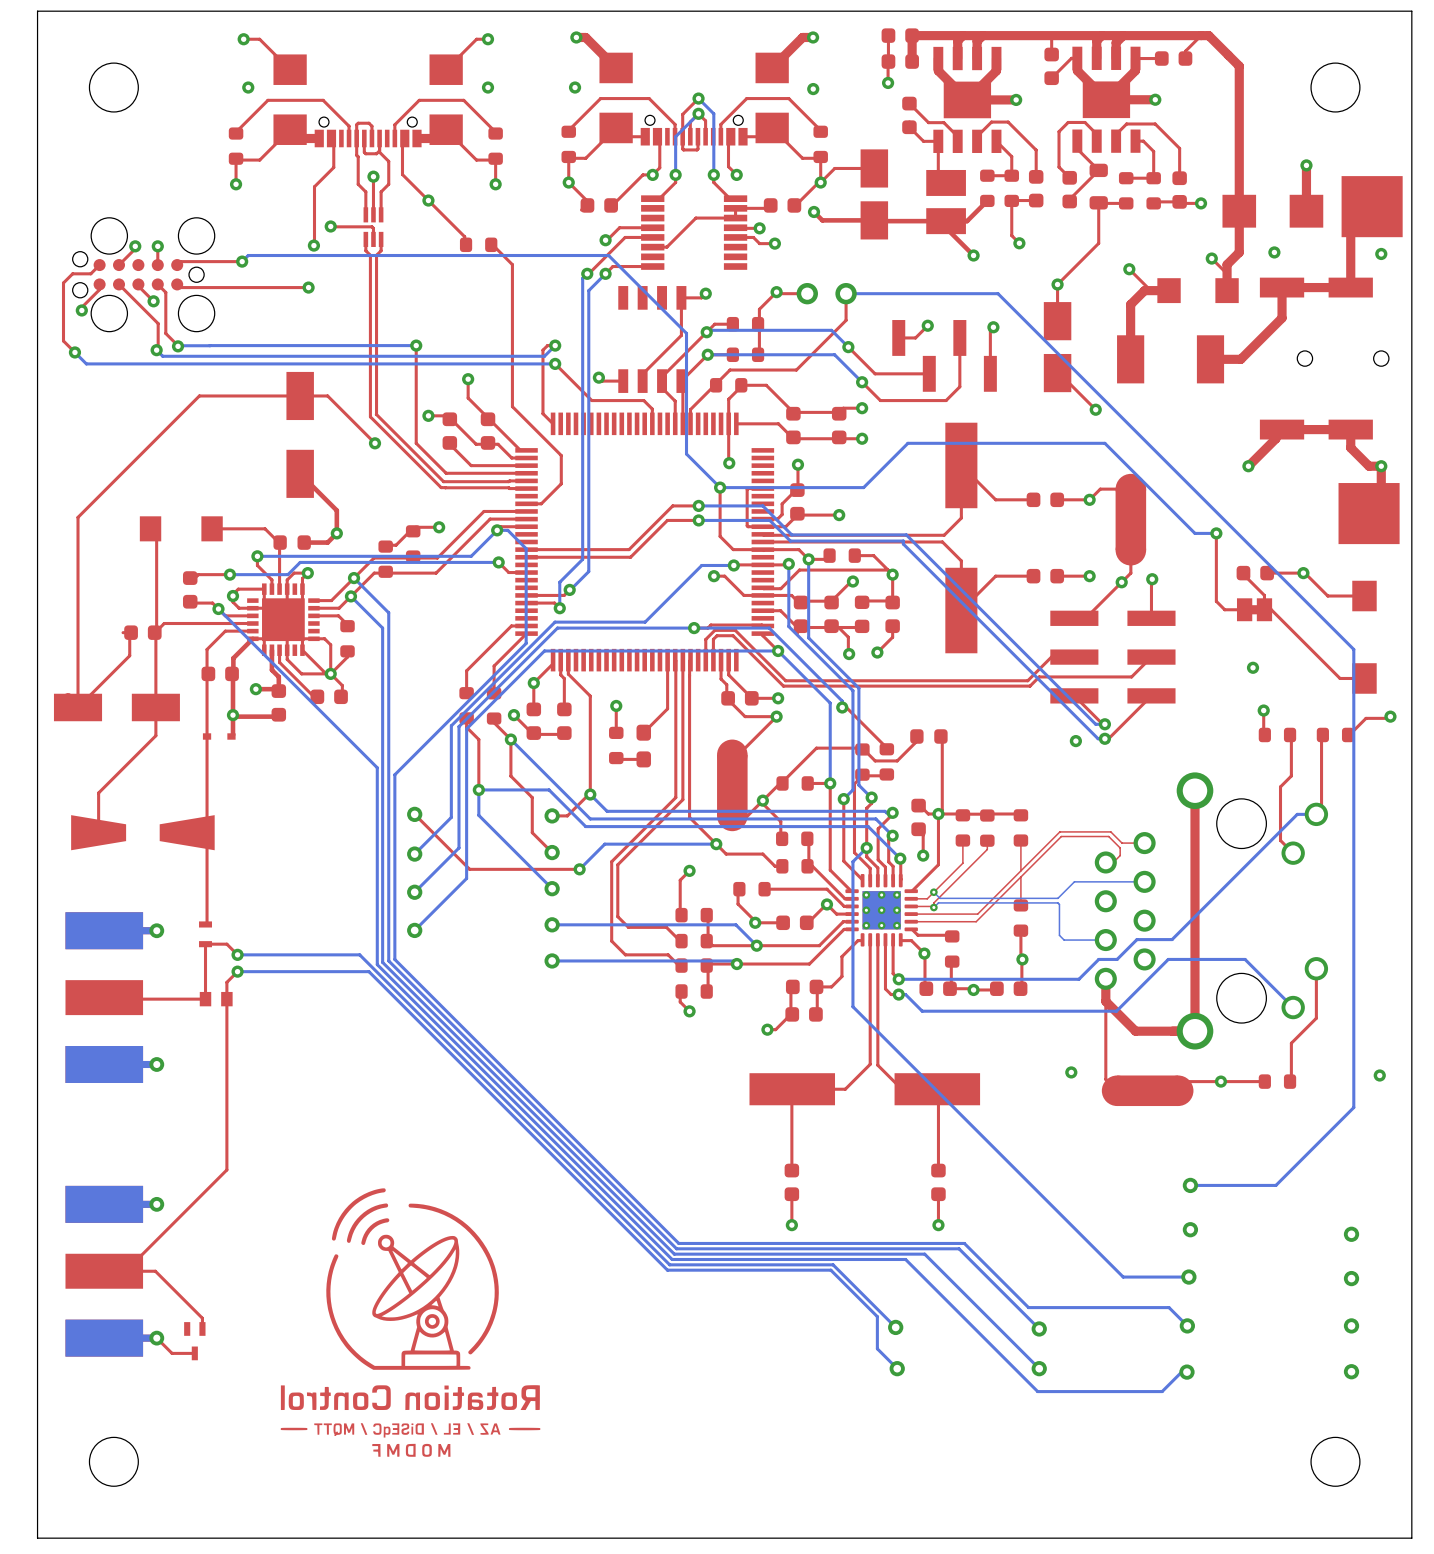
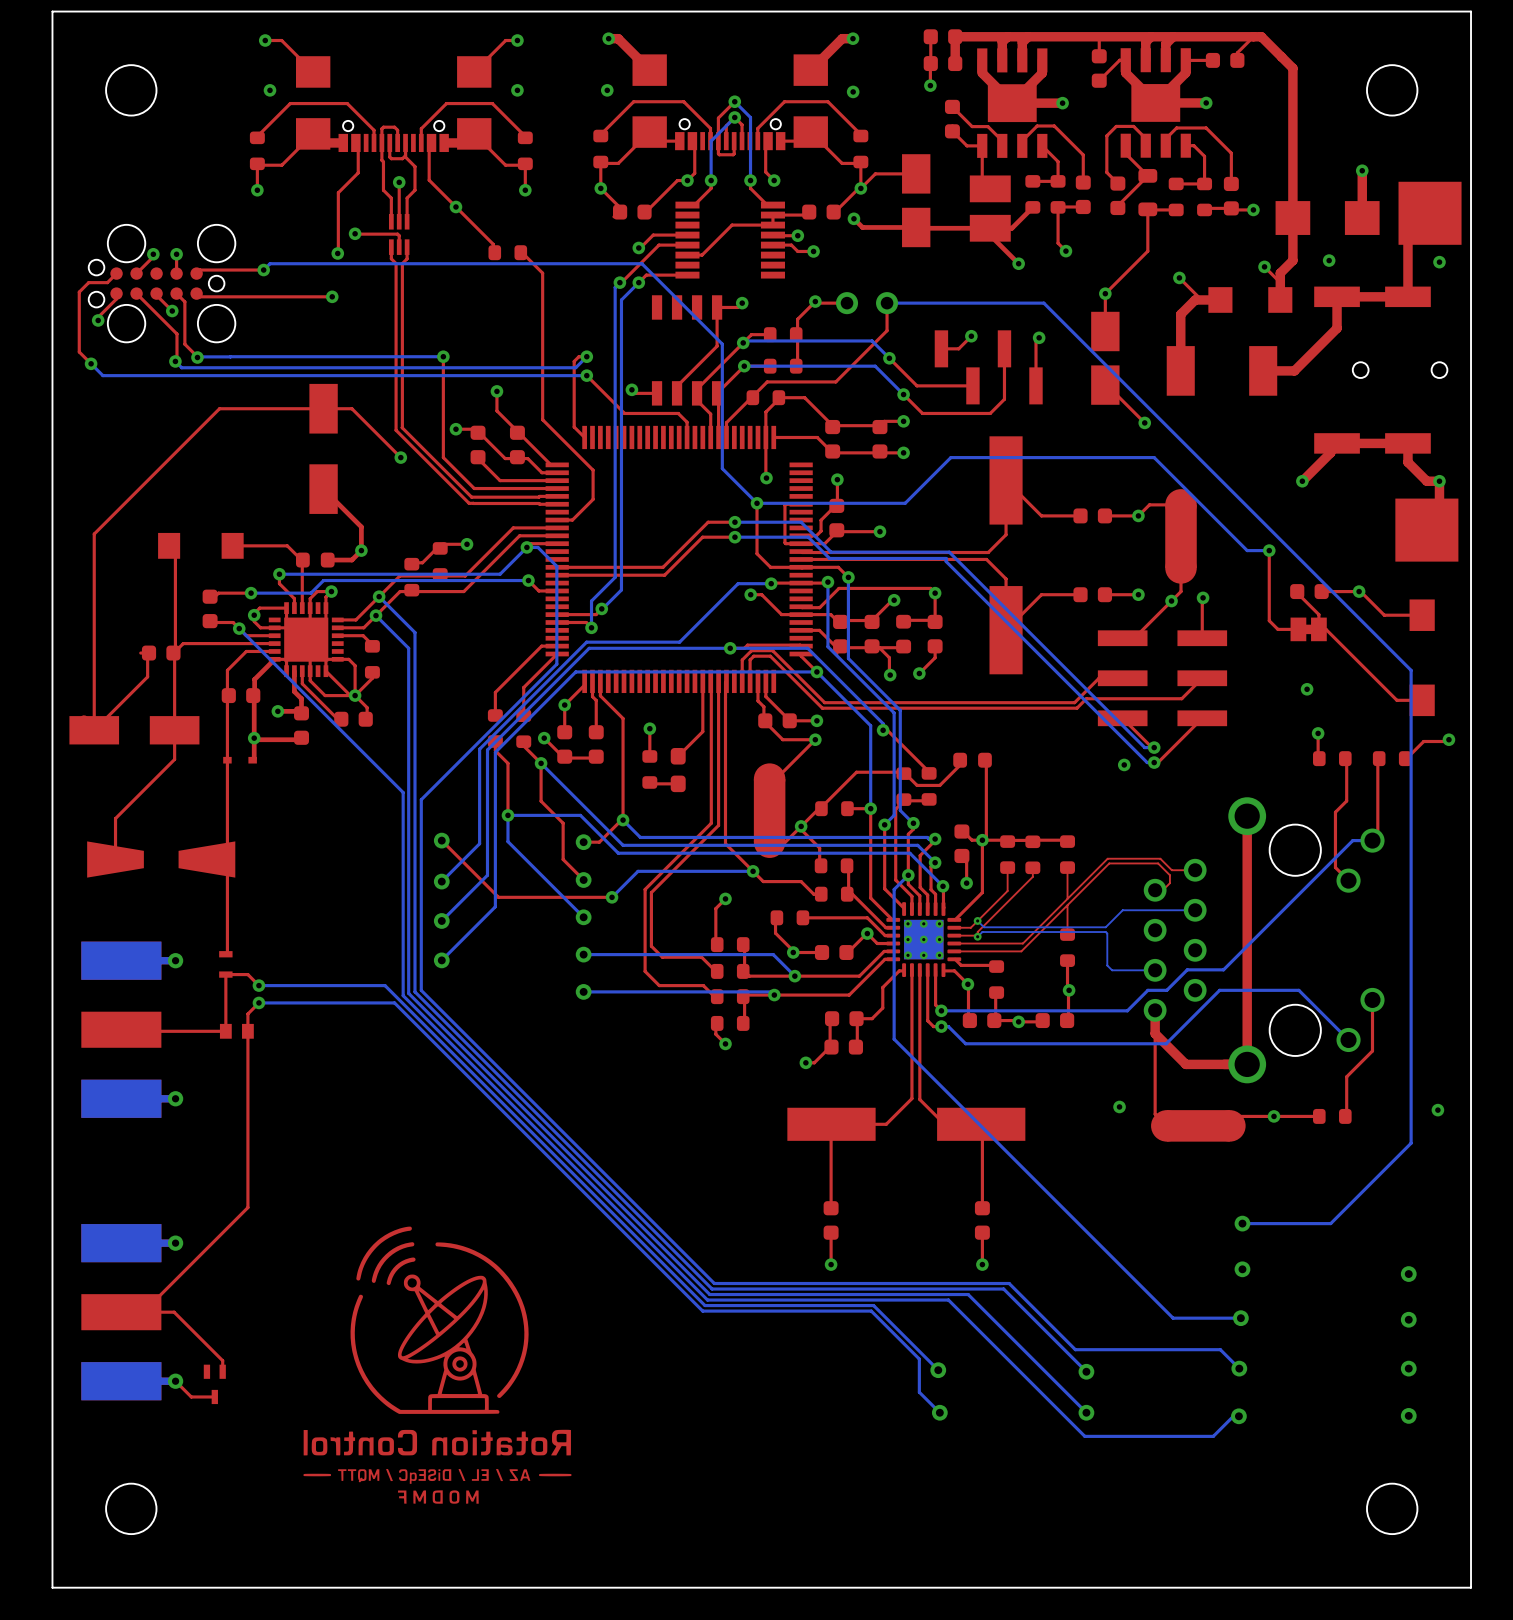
top track: (829, 555) (825, 559) (808, 559) -> none
part: (842, 555) -> none
top track: (854, 555) (873, 555) (888, 570) -> none

